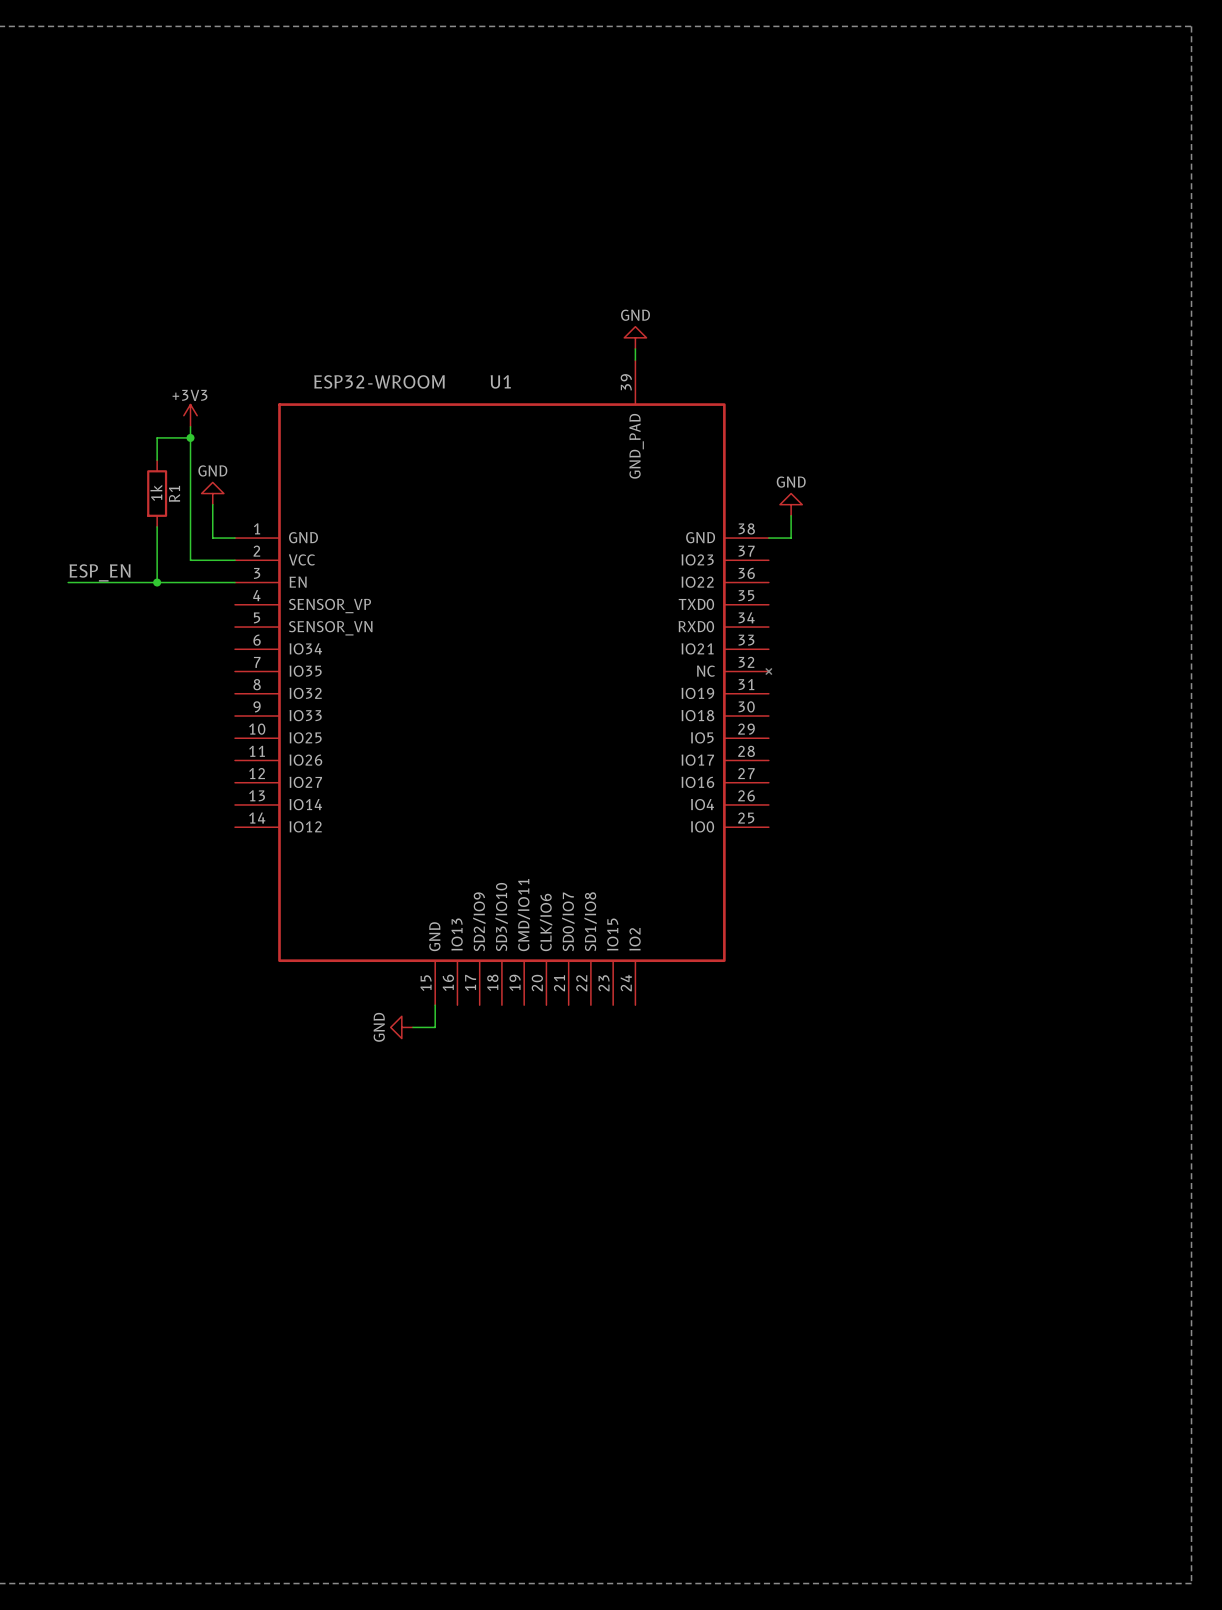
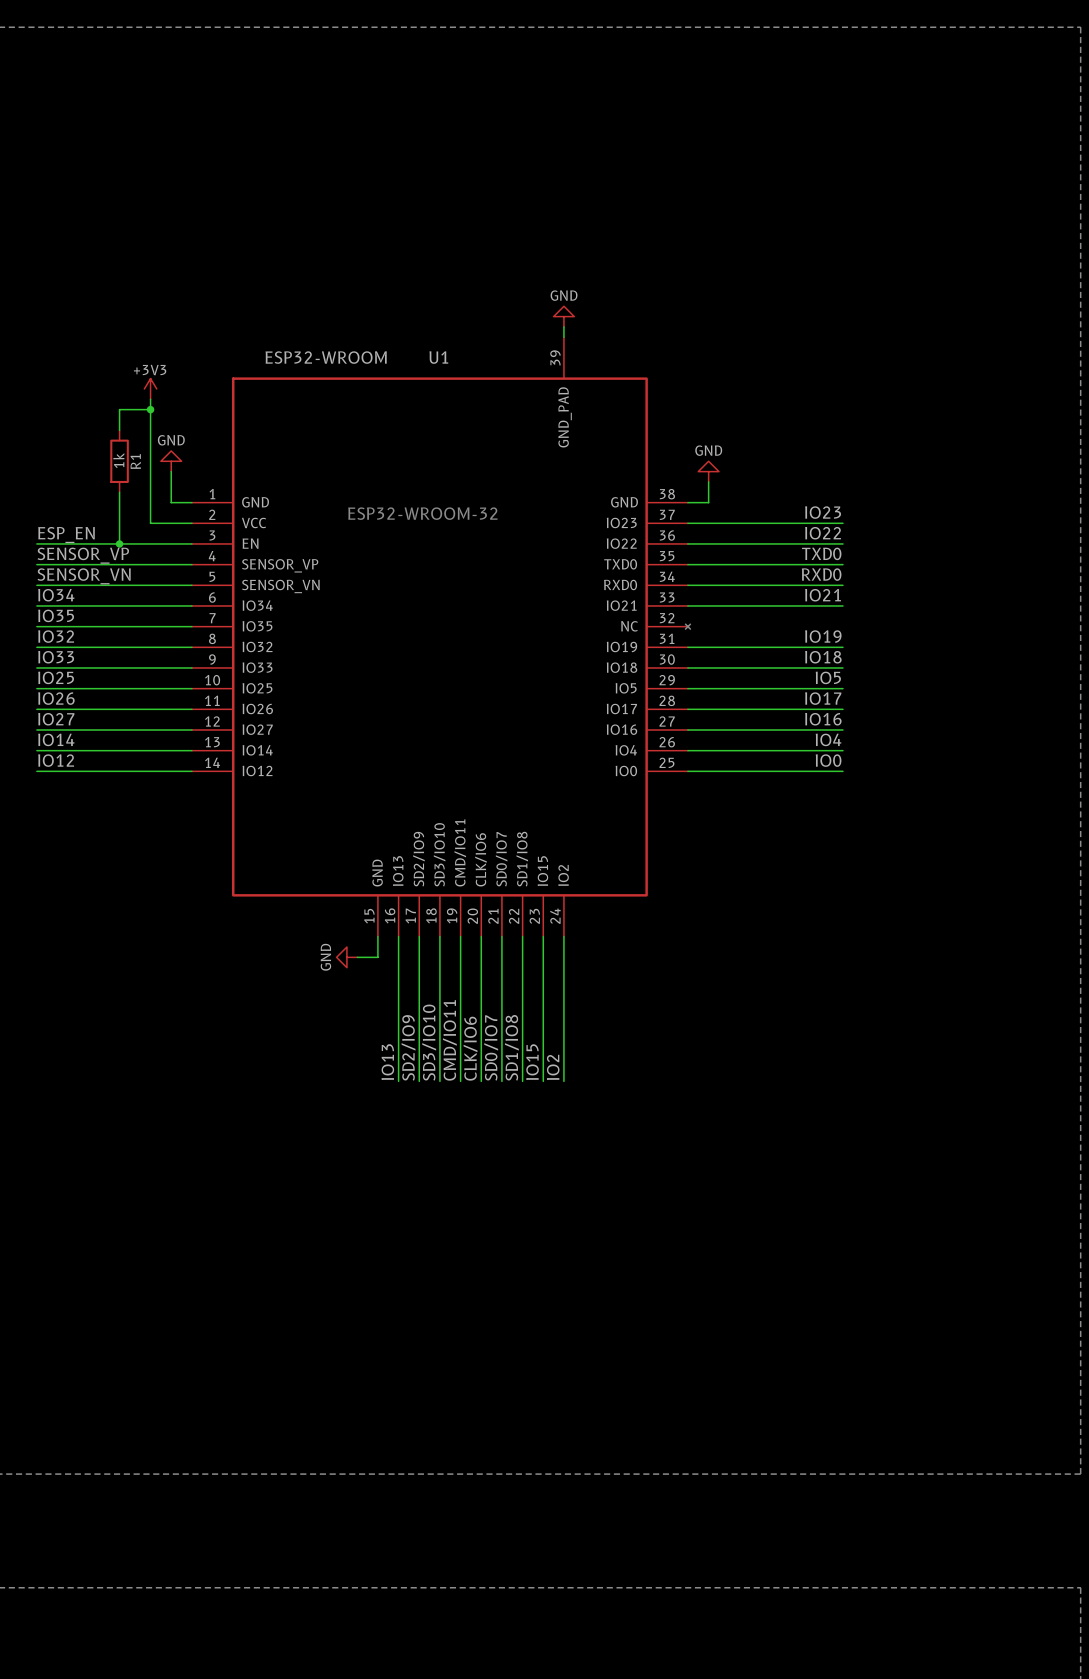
label: none -> IO23 (823, 512)
text: none -> ESP32-WROOM-32 (422, 513)
wire: none -> (687, 523) (842, 523)
label: none -> IO22 (823, 533)
wire: none -> (687, 543) (842, 543)
label: none -> TXD0 (821, 553)
label: none -> SENSOR_VP (83, 555)
wire: none -> (36, 564) (191, 564)
wire: none -> (687, 564) (842, 564)
label: none -> RXD0 (821, 574)
label: none -> SENSOR_VN (84, 576)
wire: none -> (36, 585) (191, 585)
wire: none -> (687, 585) (842, 585)
label: none -> IO34 (56, 595)
label: none -> IO21 (823, 595)
wire: none -> (36, 605) (191, 605)
wire: none -> (687, 605) (842, 605)
label: none -> IO35 (56, 615)
wire: none -> (36, 626) (191, 626)
label: none -> IO32 (56, 636)
label: none -> IO19 (823, 636)
wire: none -> (36, 647) (191, 647)
wire: none -> (687, 647) (842, 647)
label: none -> IO33 (56, 657)
label: none -> IO18 (823, 657)
wire: none -> (36, 667) (191, 667)
wire: none -> (687, 667) (842, 667)
label: none -> IO25 (56, 677)
label: none -> IO5 (828, 677)
wire: none -> (36, 688) (191, 688)
wire: none -> (687, 688) (842, 688)
label: none -> IO26 (56, 698)
label: none -> IO17 (823, 698)
wire: none -> (36, 709) (191, 709)
wire: none -> (687, 709) (842, 709)
label: none -> IO27 (56, 719)
label: none -> IO16 (823, 719)
wire: none -> (36, 729) (191, 729)
wire: none -> (687, 729) (842, 729)
label: none -> IO14 (56, 739)
label: none -> IO4 (828, 739)
wire: none -> (36, 750) (191, 750)
wire: none -> (687, 750) (842, 750)
label: none -> IO12 (56, 760)
label: none -> IO0 (828, 760)
wire: none -> (36, 771) (191, 771)
wire: none -> (687, 771) (842, 771)
wire: none -> (398, 936) (398, 1081)
wire: none -> (419, 936) (419, 1081)
wire: none -> (439, 936) (439, 1081)
wire: none -> (460, 936) (460, 1081)
wire: none -> (481, 936) (481, 1081)
wire: none -> (501, 936) (501, 1081)
wire: none -> (522, 936) (522, 1081)
wire: none -> (543, 936) (543, 1081)
wire: none -> (563, 936) (563, 1081)
label: none -> CMD/IO11 (449, 1040)
label: none -> SD3/IO10 (429, 1042)
label: none -> SD2/IO9 (408, 1047)
label: none -> SD0/IO7 (491, 1047)
label: none -> SD1/IO8 (511, 1047)
label: none -> CLK/IO6 (470, 1048)
label: none -> IO13 (387, 1062)
label: none -> IO15 (532, 1062)
label: none -> IO2 (553, 1067)

